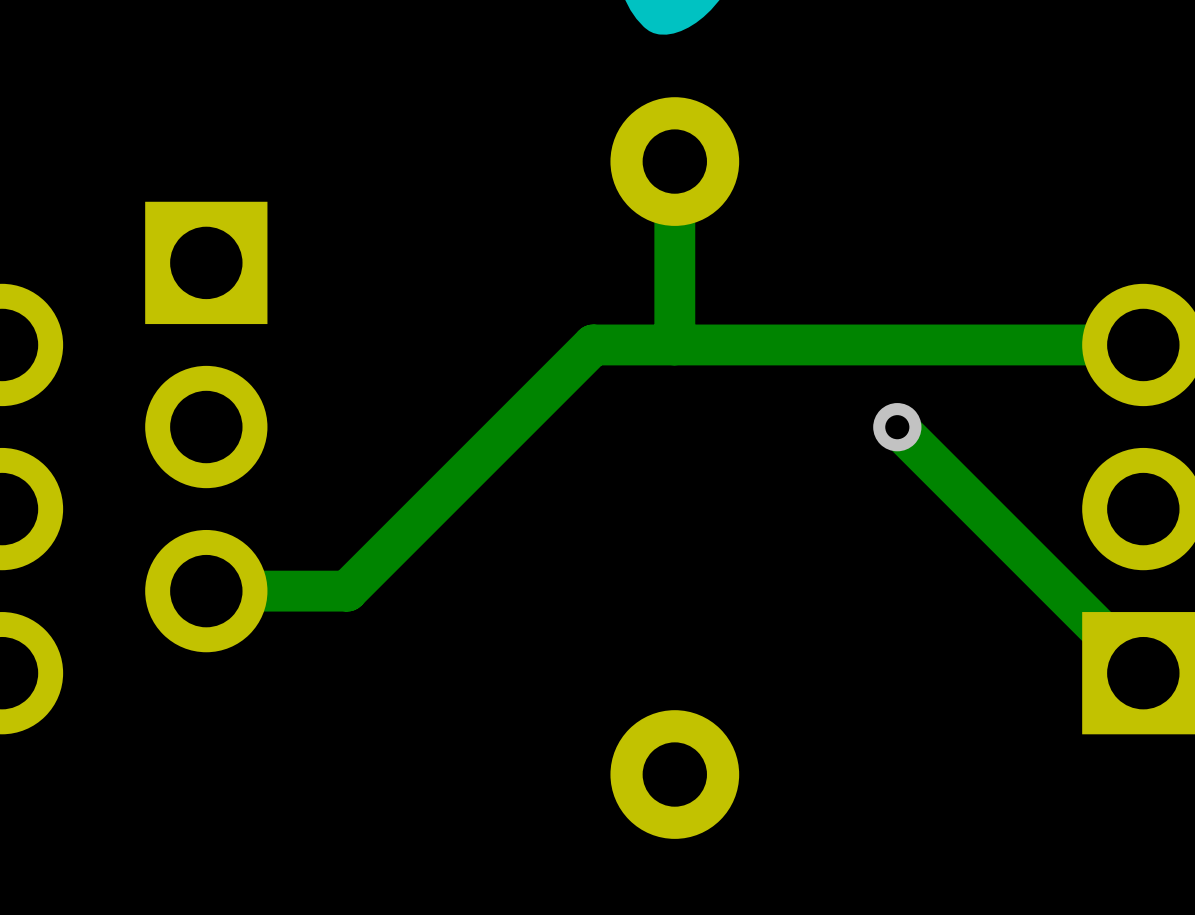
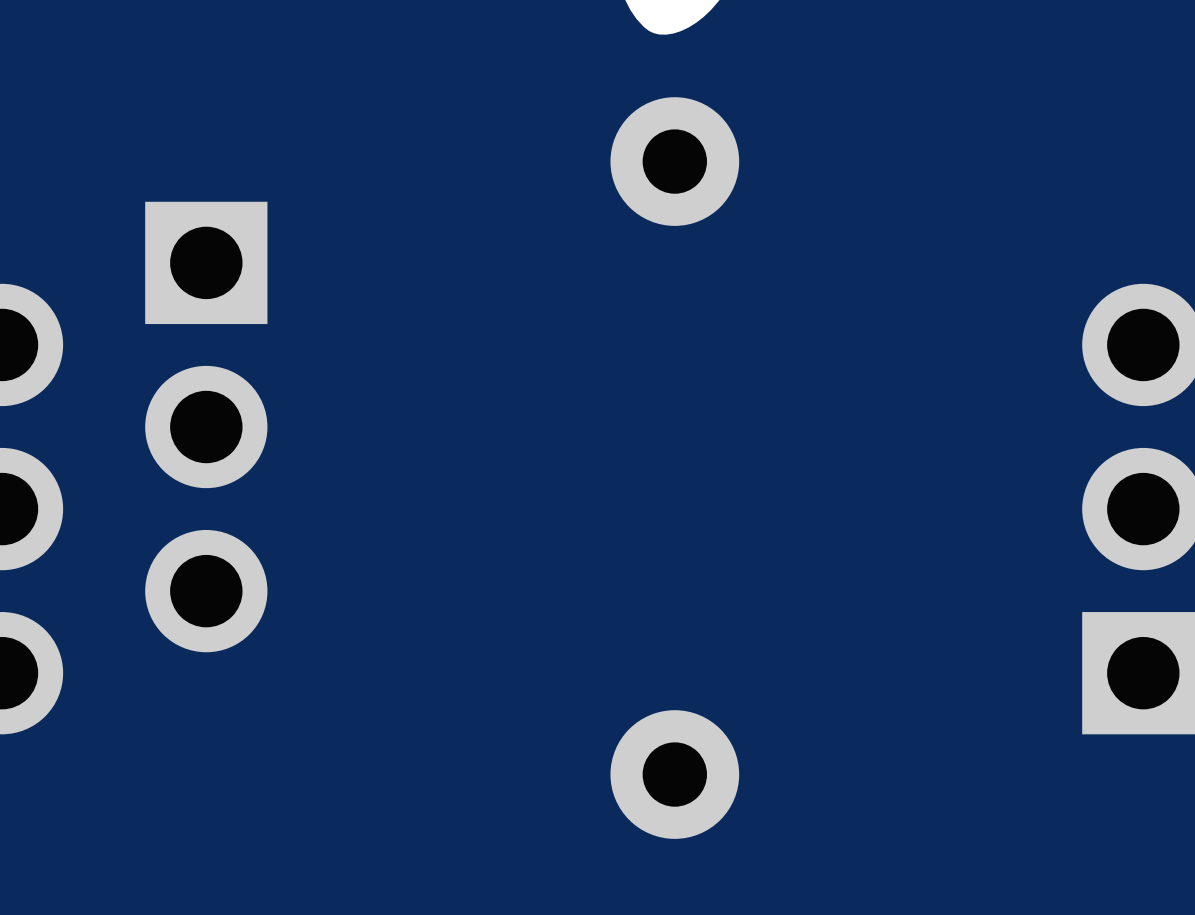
track: (674, 161) (674, 344) -> none
track: (1143, 344) (593, 344) (347, 591) (206, 591) -> none
track: (897, 427) (1143, 673) -> none
via: (897, 427) -> none

